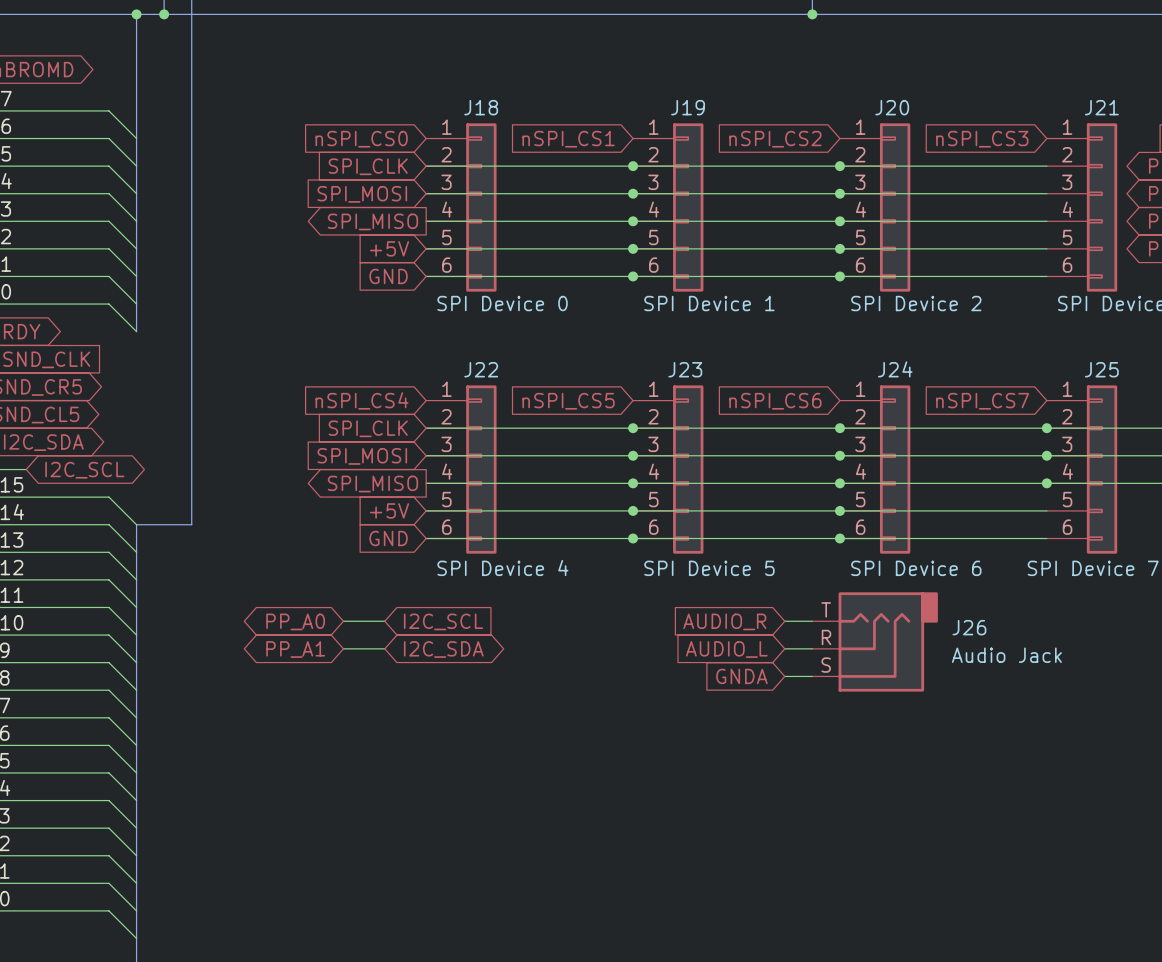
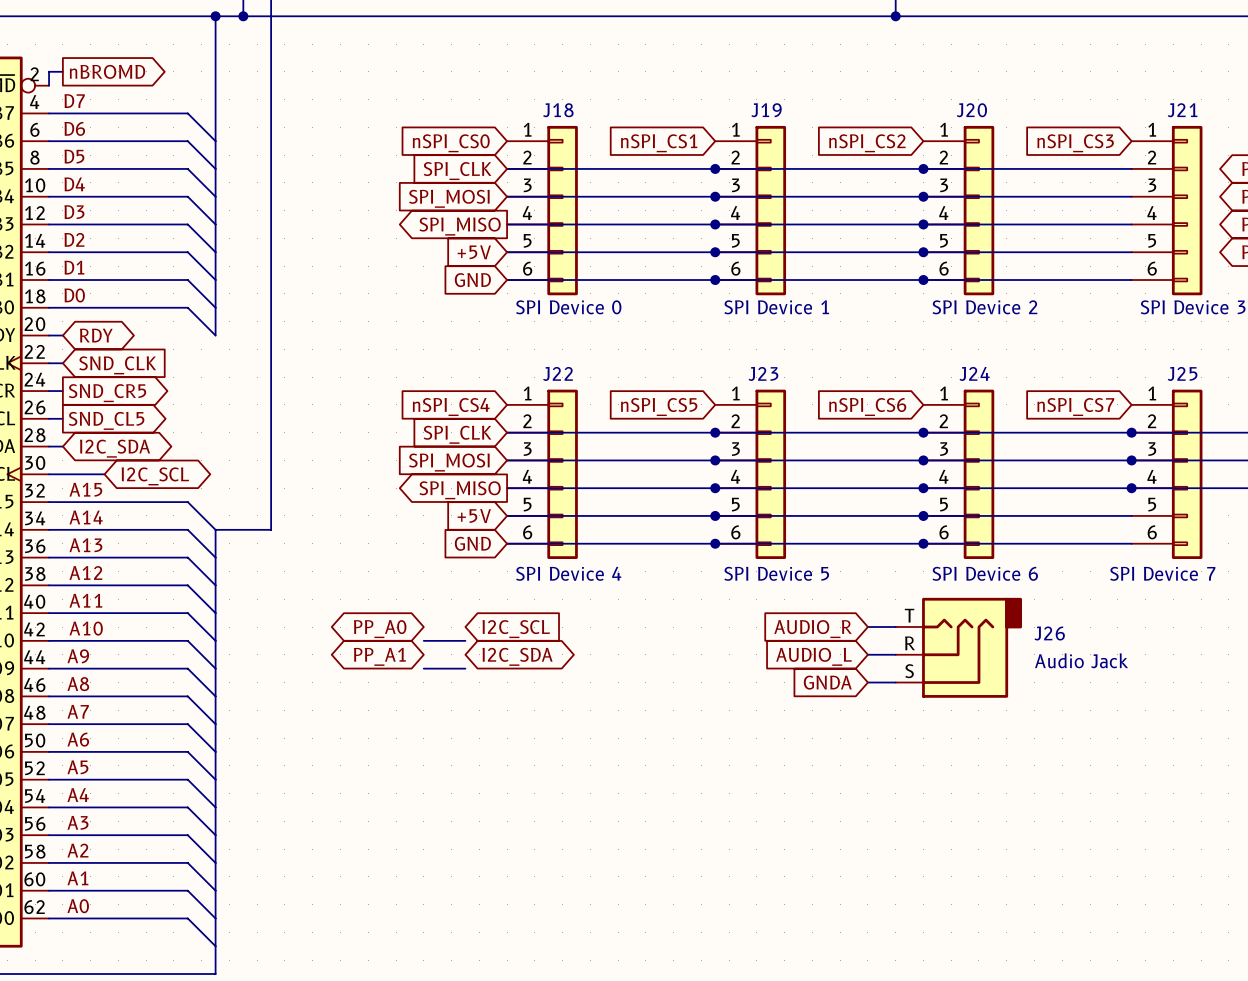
wire: (343, 621) (384, 621) -> (423, 640) (465, 640)
wire: (343, 648) (384, 648) -> (423, 668) (465, 668)

